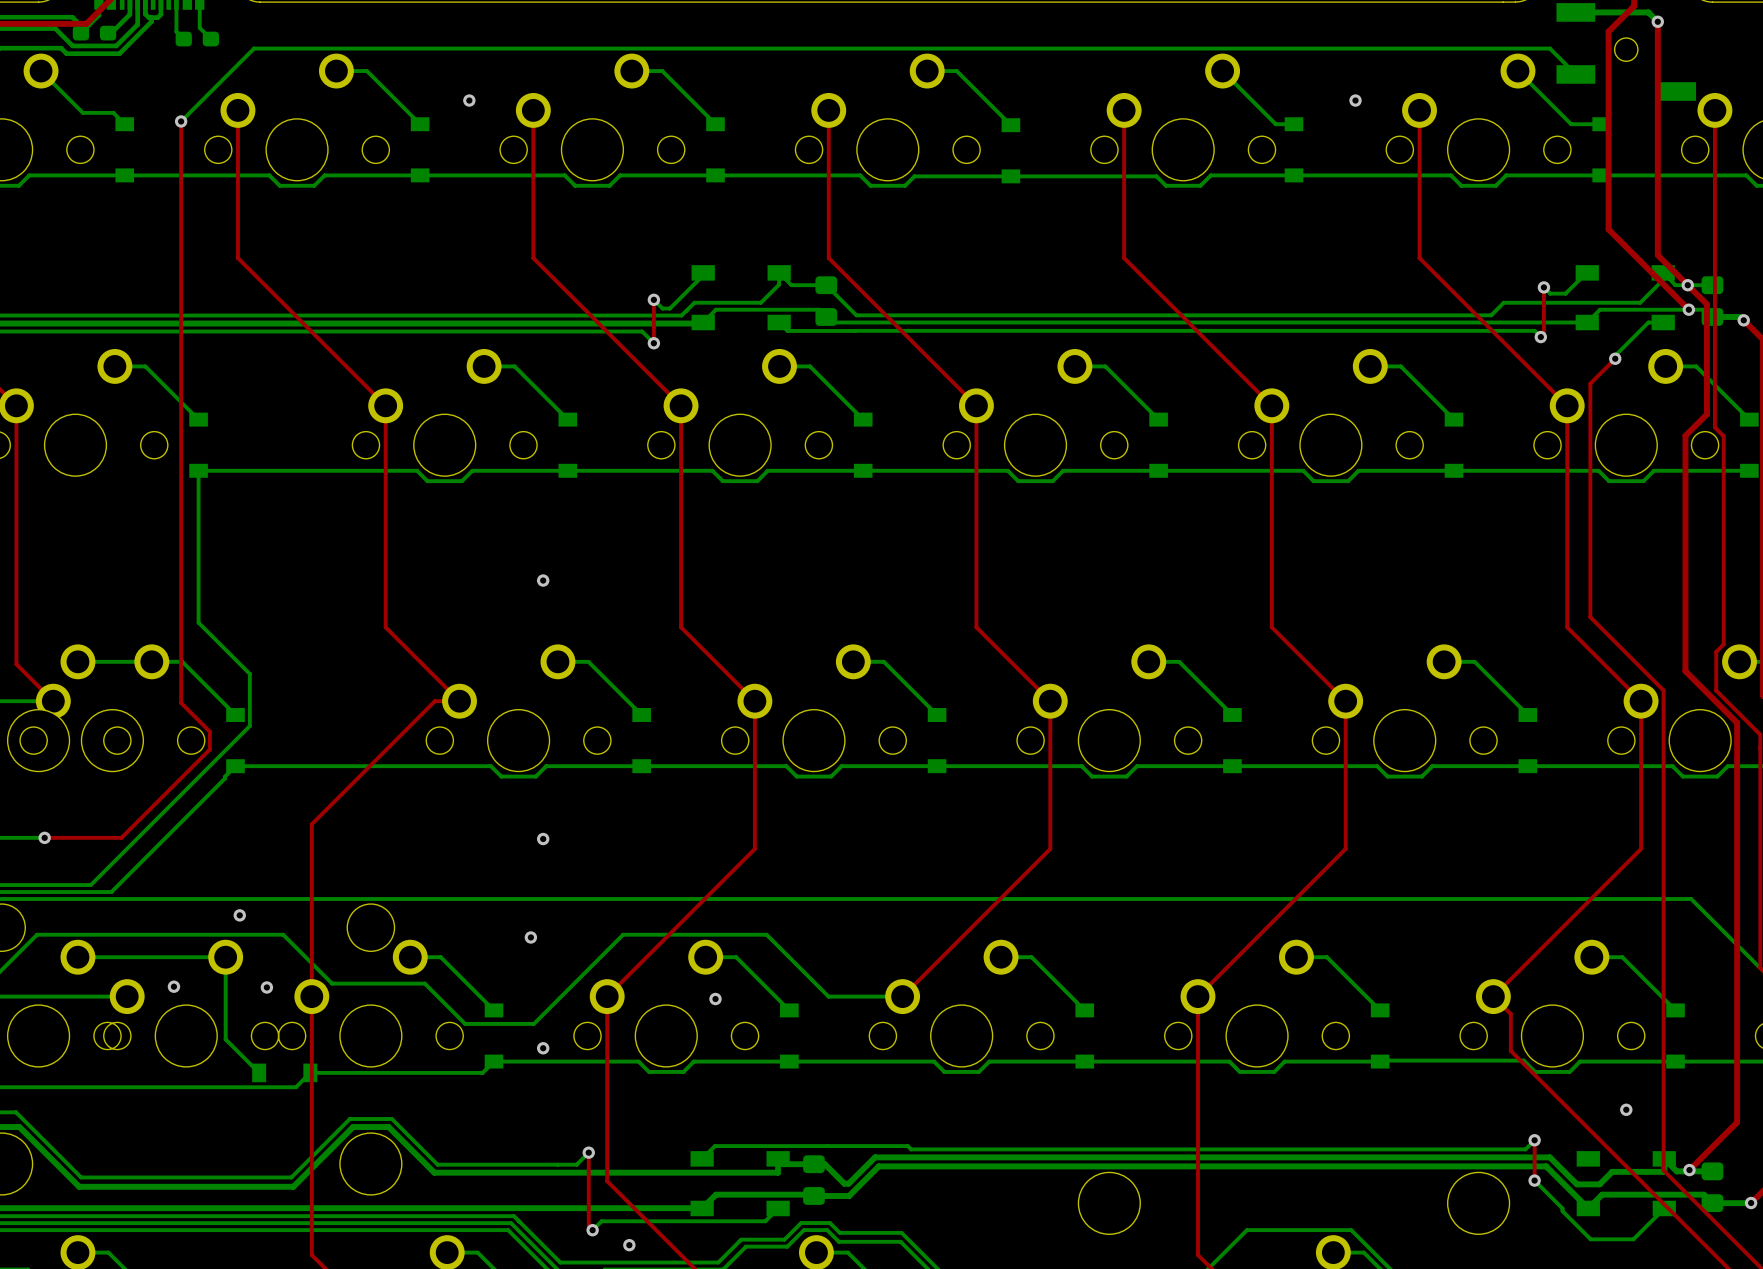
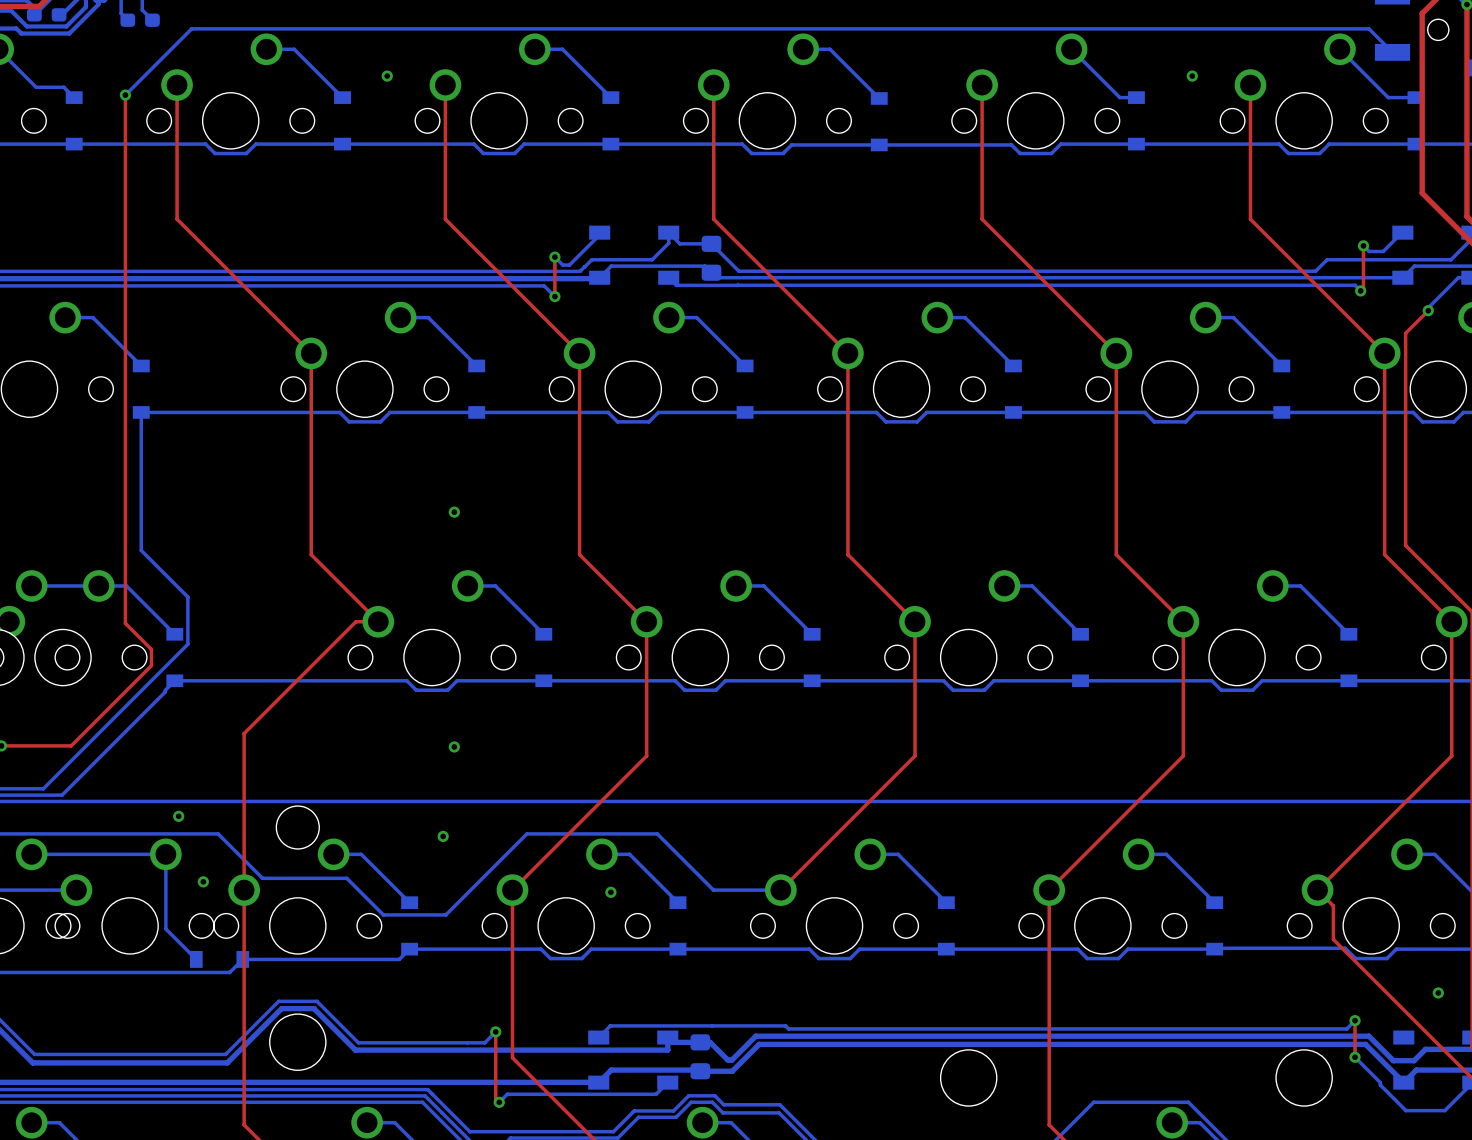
via: (173, 986) -> none
via: (543, 1048) -> none
via: (629, 1245) -> none

